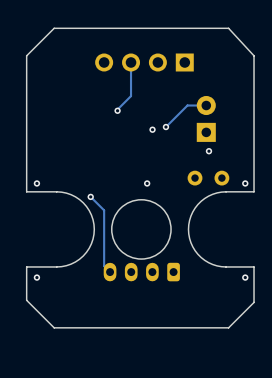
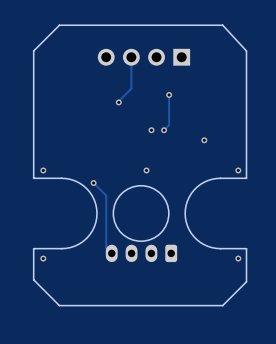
track: none -> (169, 94) (169, 125) (164, 130)
via: none -> (169, 94)
track: (206, 105) (187, 105) (165, 127) -> none
part: (206, 118) -> none
via: (165, 127) -> none
via: (152, 129) -> none
via: none -> (151, 130)
via: none -> (164, 130)
part: (208, 178) -> none

